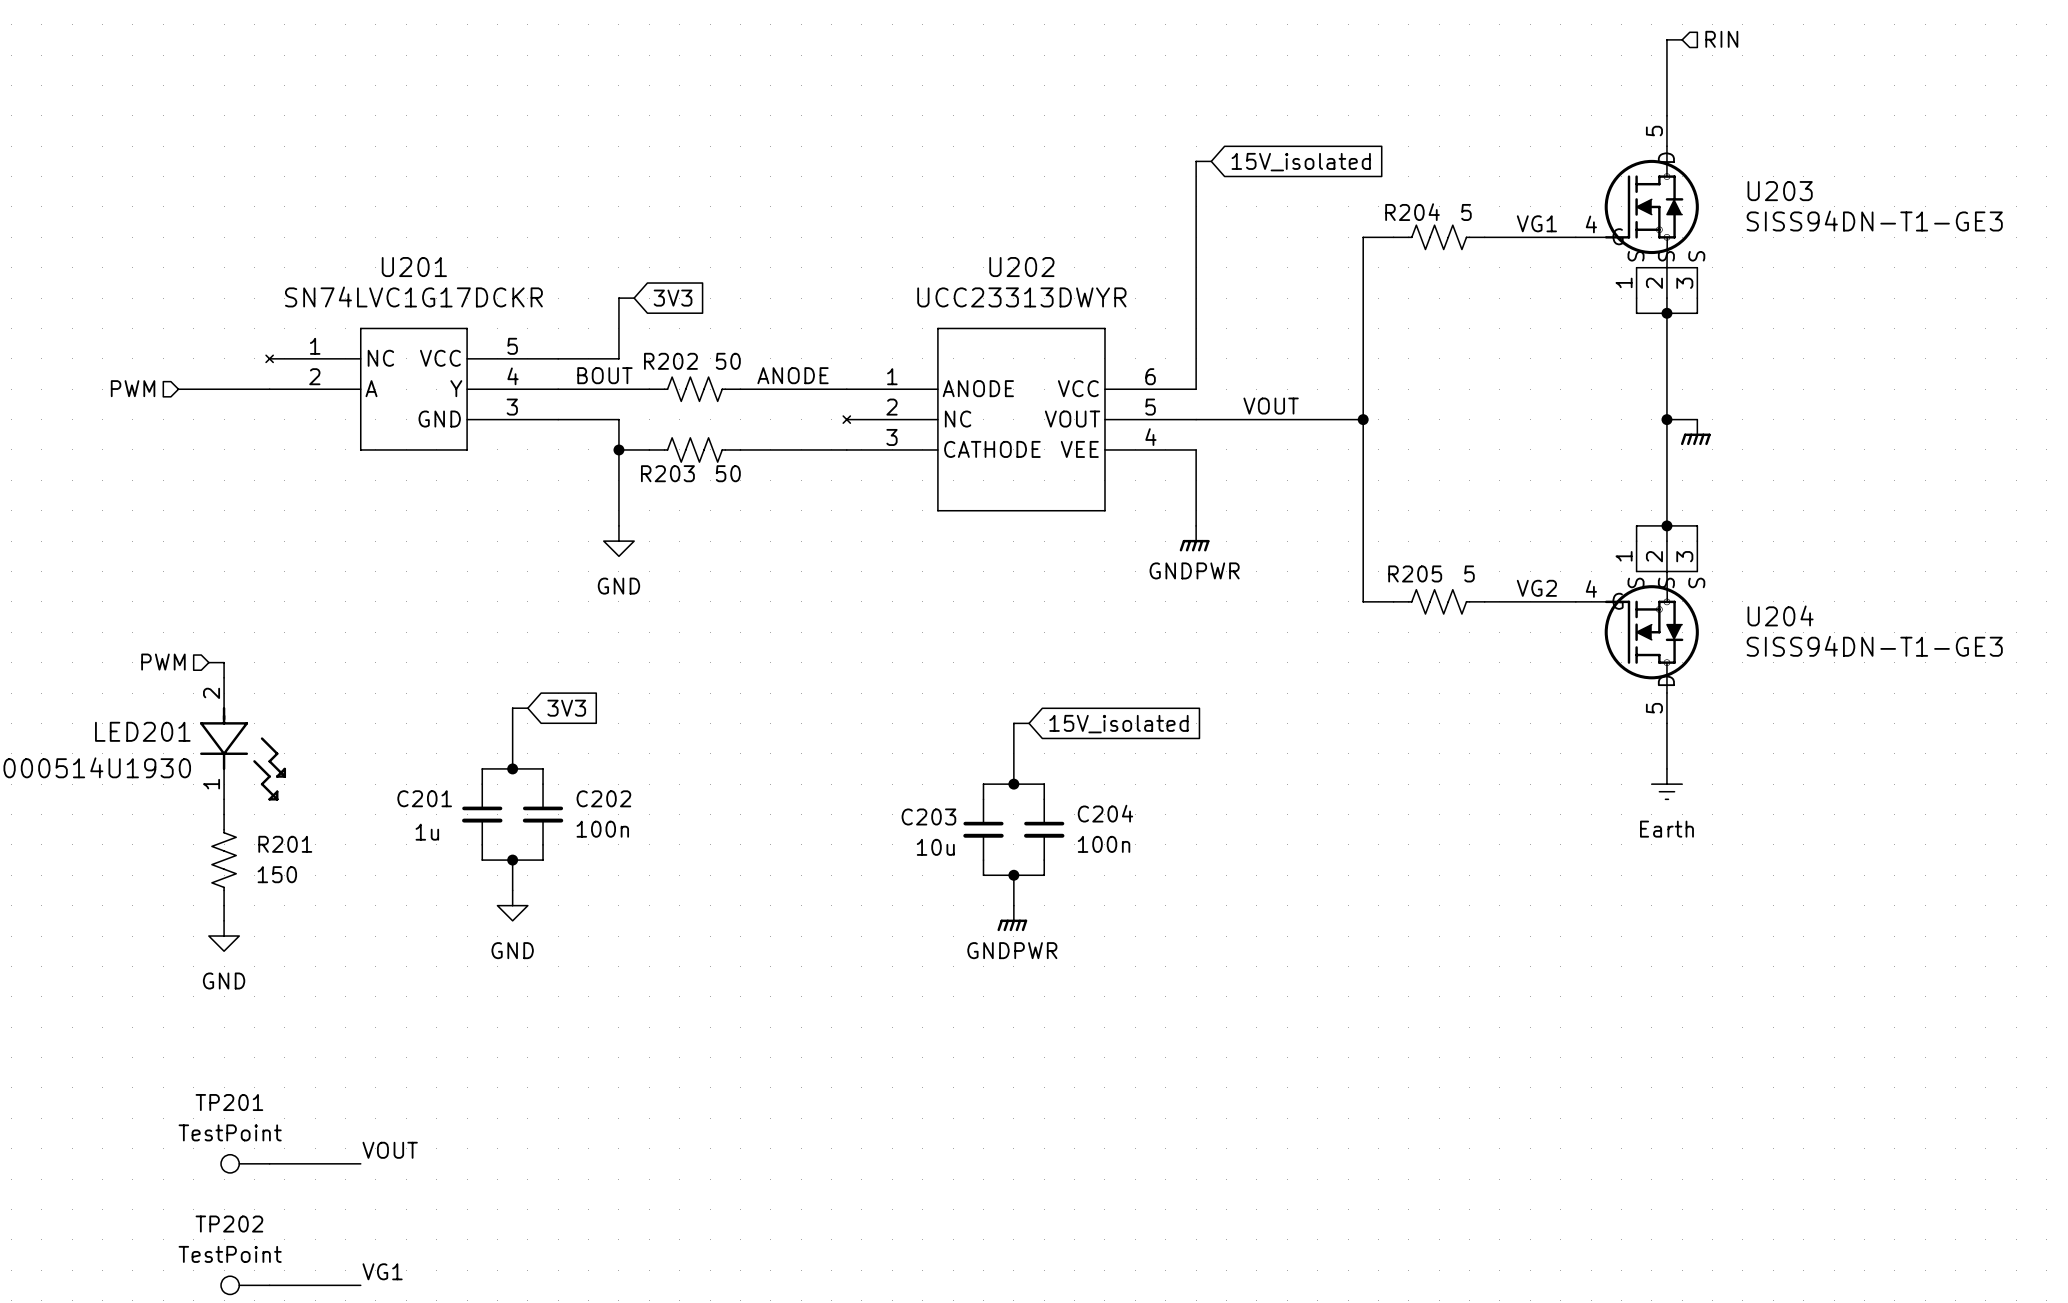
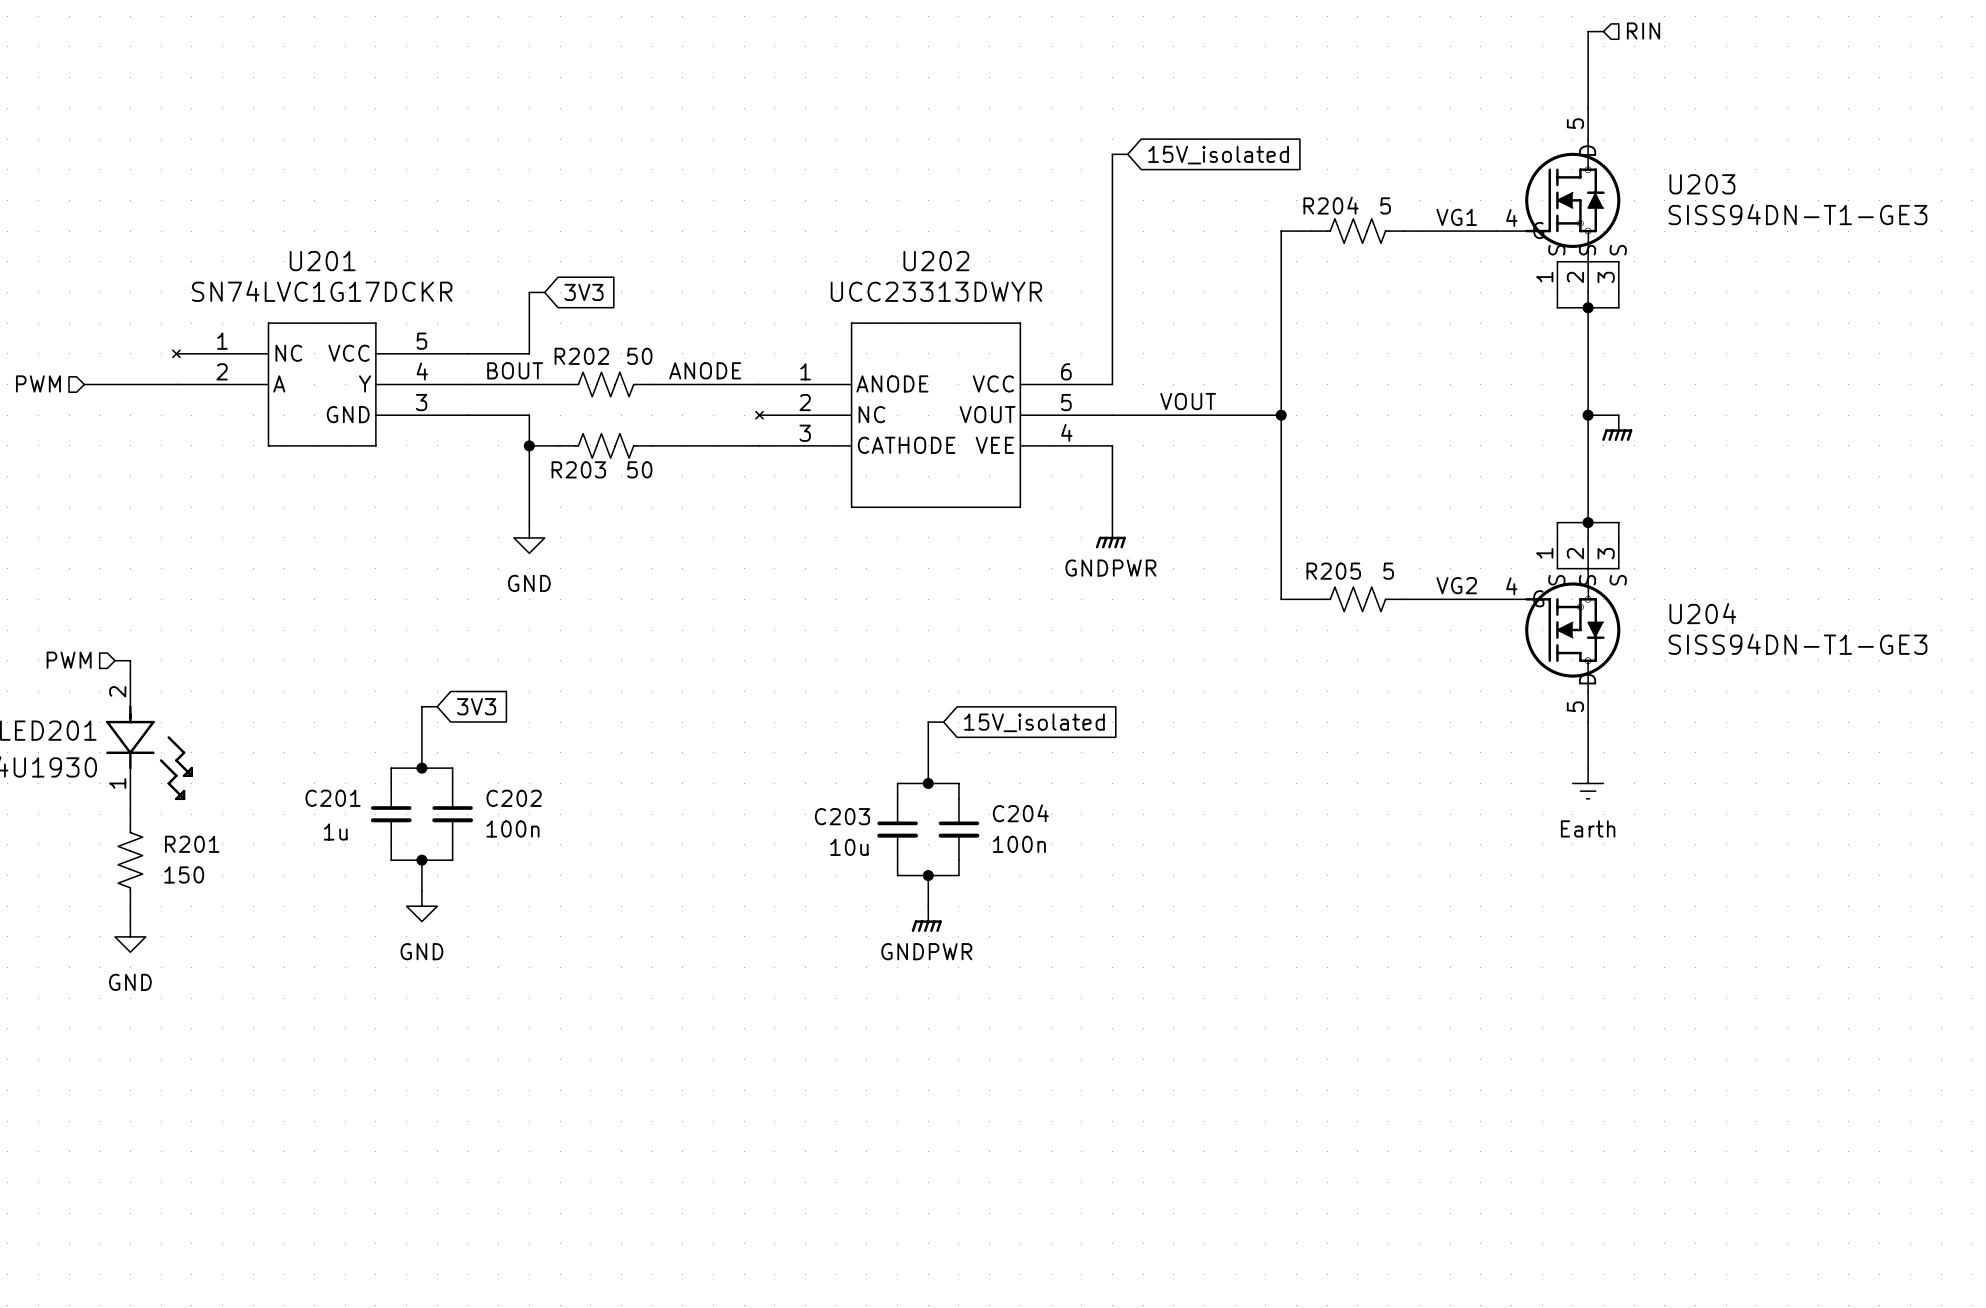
label: VOUT (390, 1150) -> none
TP201: TestPoint (245, 1163) -> none
wire: (269, 1163) (360, 1163) -> none
label: VG1 (382, 1271) -> none
TP202: TestPoint (245, 1285) -> none
wire: (269, 1285) (360, 1285) -> none

